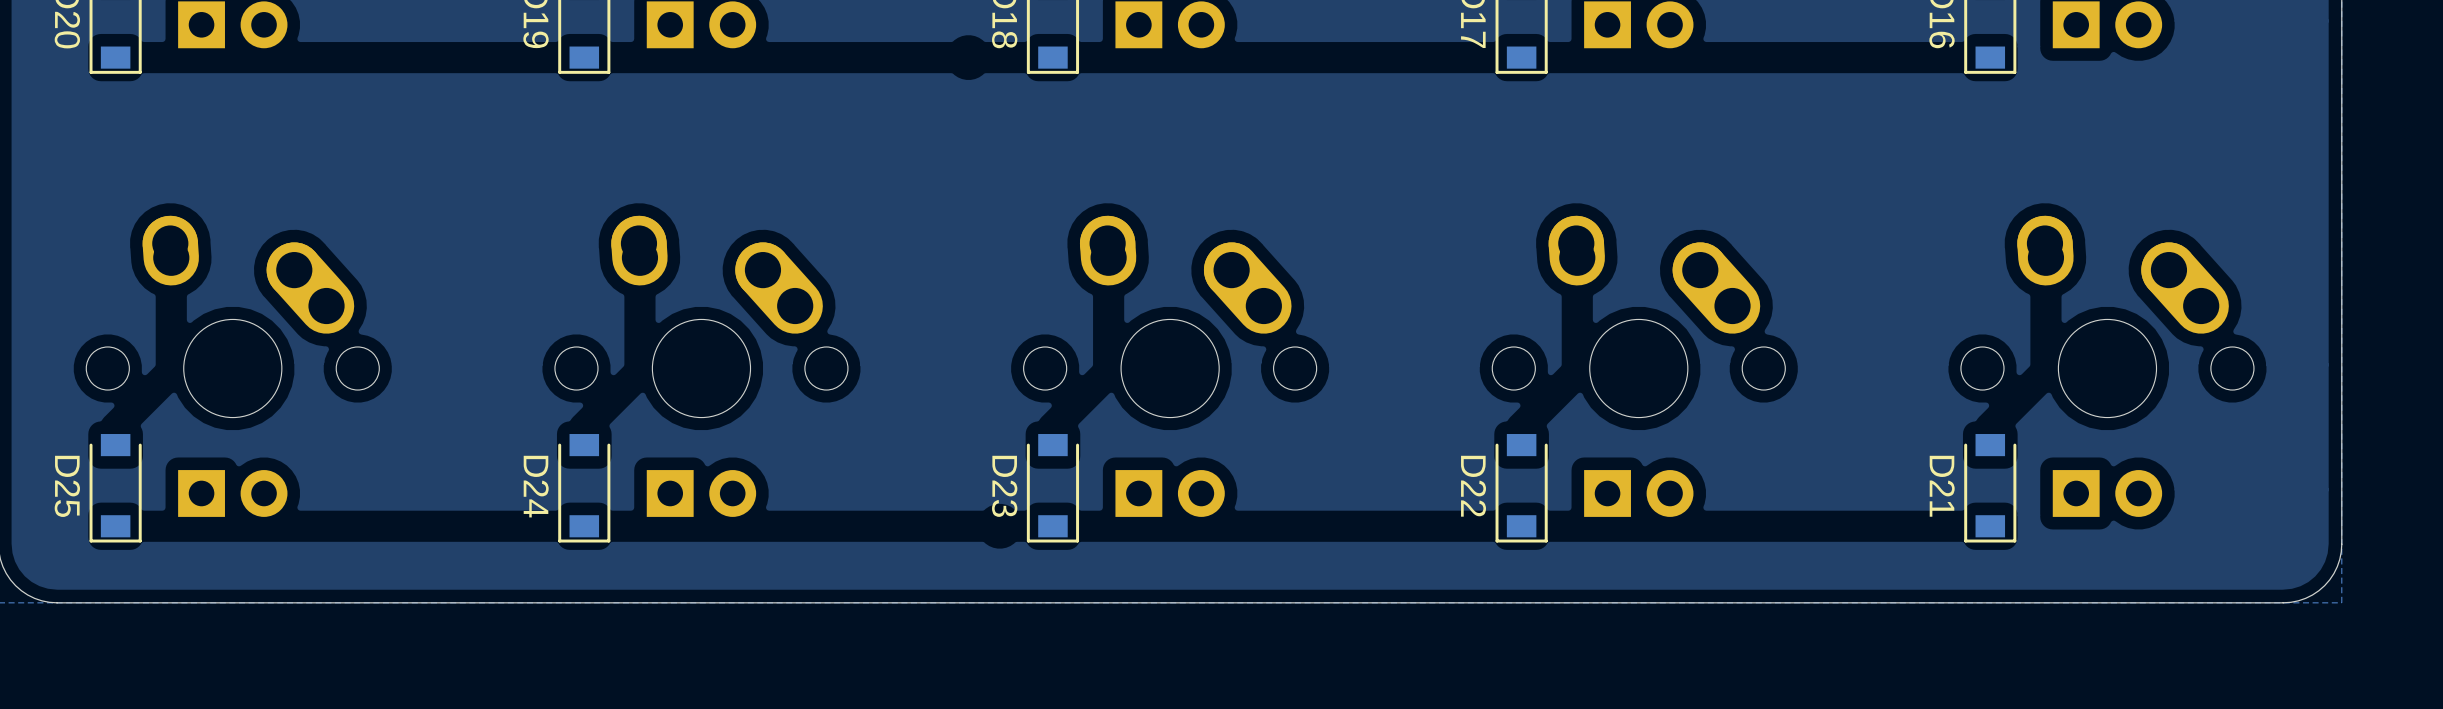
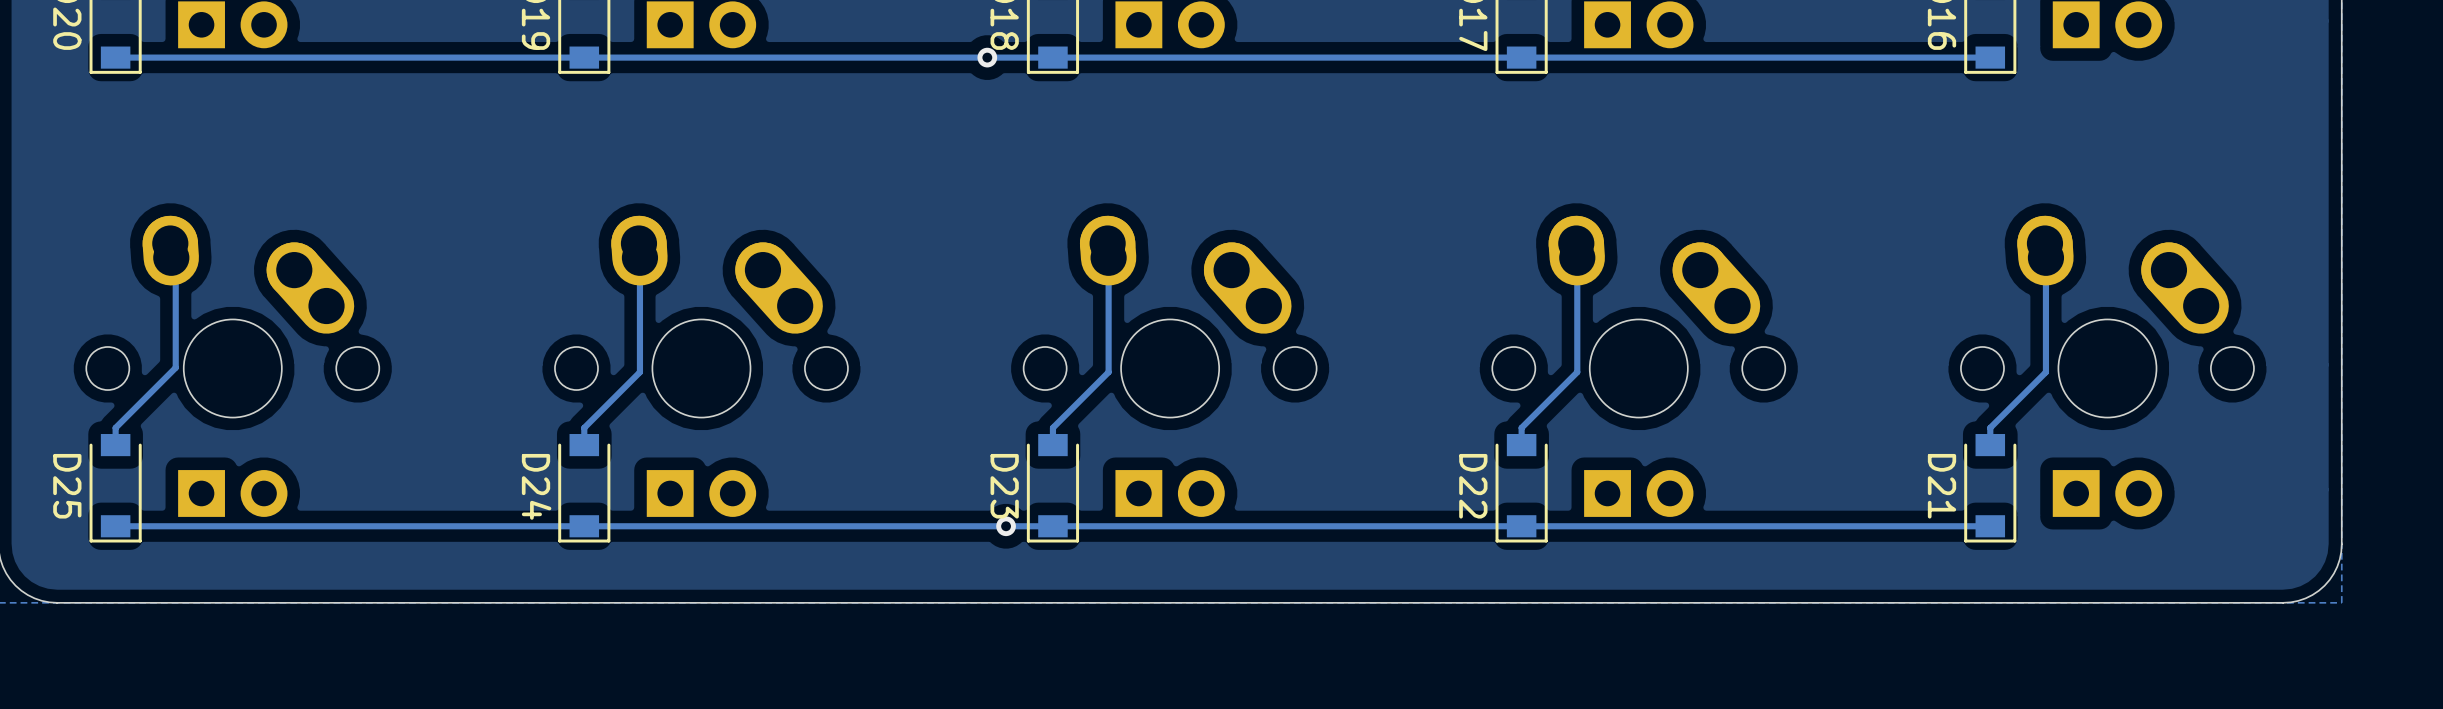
via: none -> (987, 57)
track: none -> (1990, 57) (115, 57)
track: none -> (171, 257) (175, 262) (175, 367) (115, 427) (115, 445)
track: none -> (639, 257) (639, 372) (584, 427) (584, 445)
track: none -> (1108, 257) (1108, 372) (1052, 427) (1052, 445)
track: none -> (1577, 257) (1577, 372) (1521, 427) (1521, 445)
track: none -> (2045, 257) (2045, 372) (1990, 427) (1990, 445)
via: none -> (1006, 526)
track: none -> (1990, 526) (115, 526)

